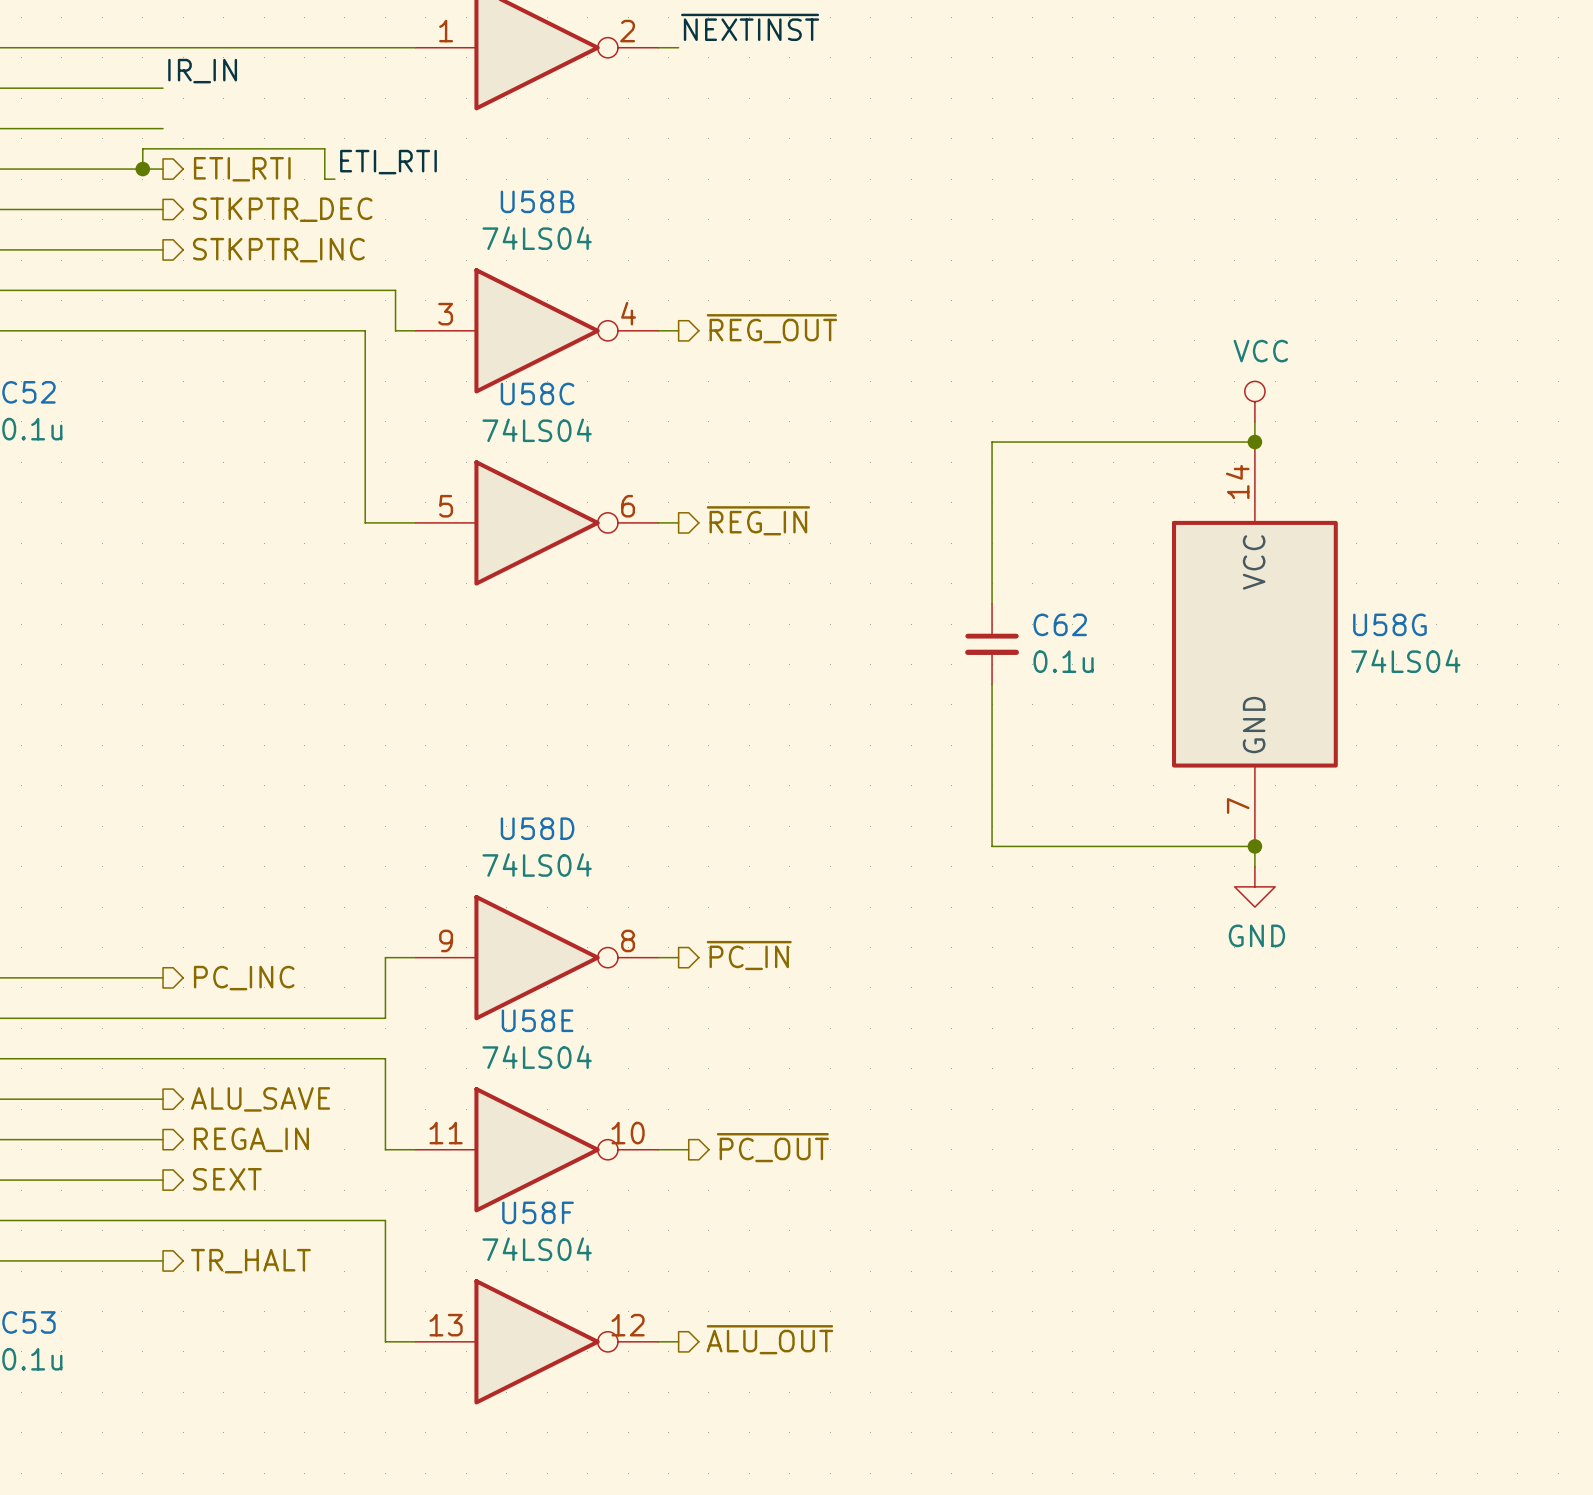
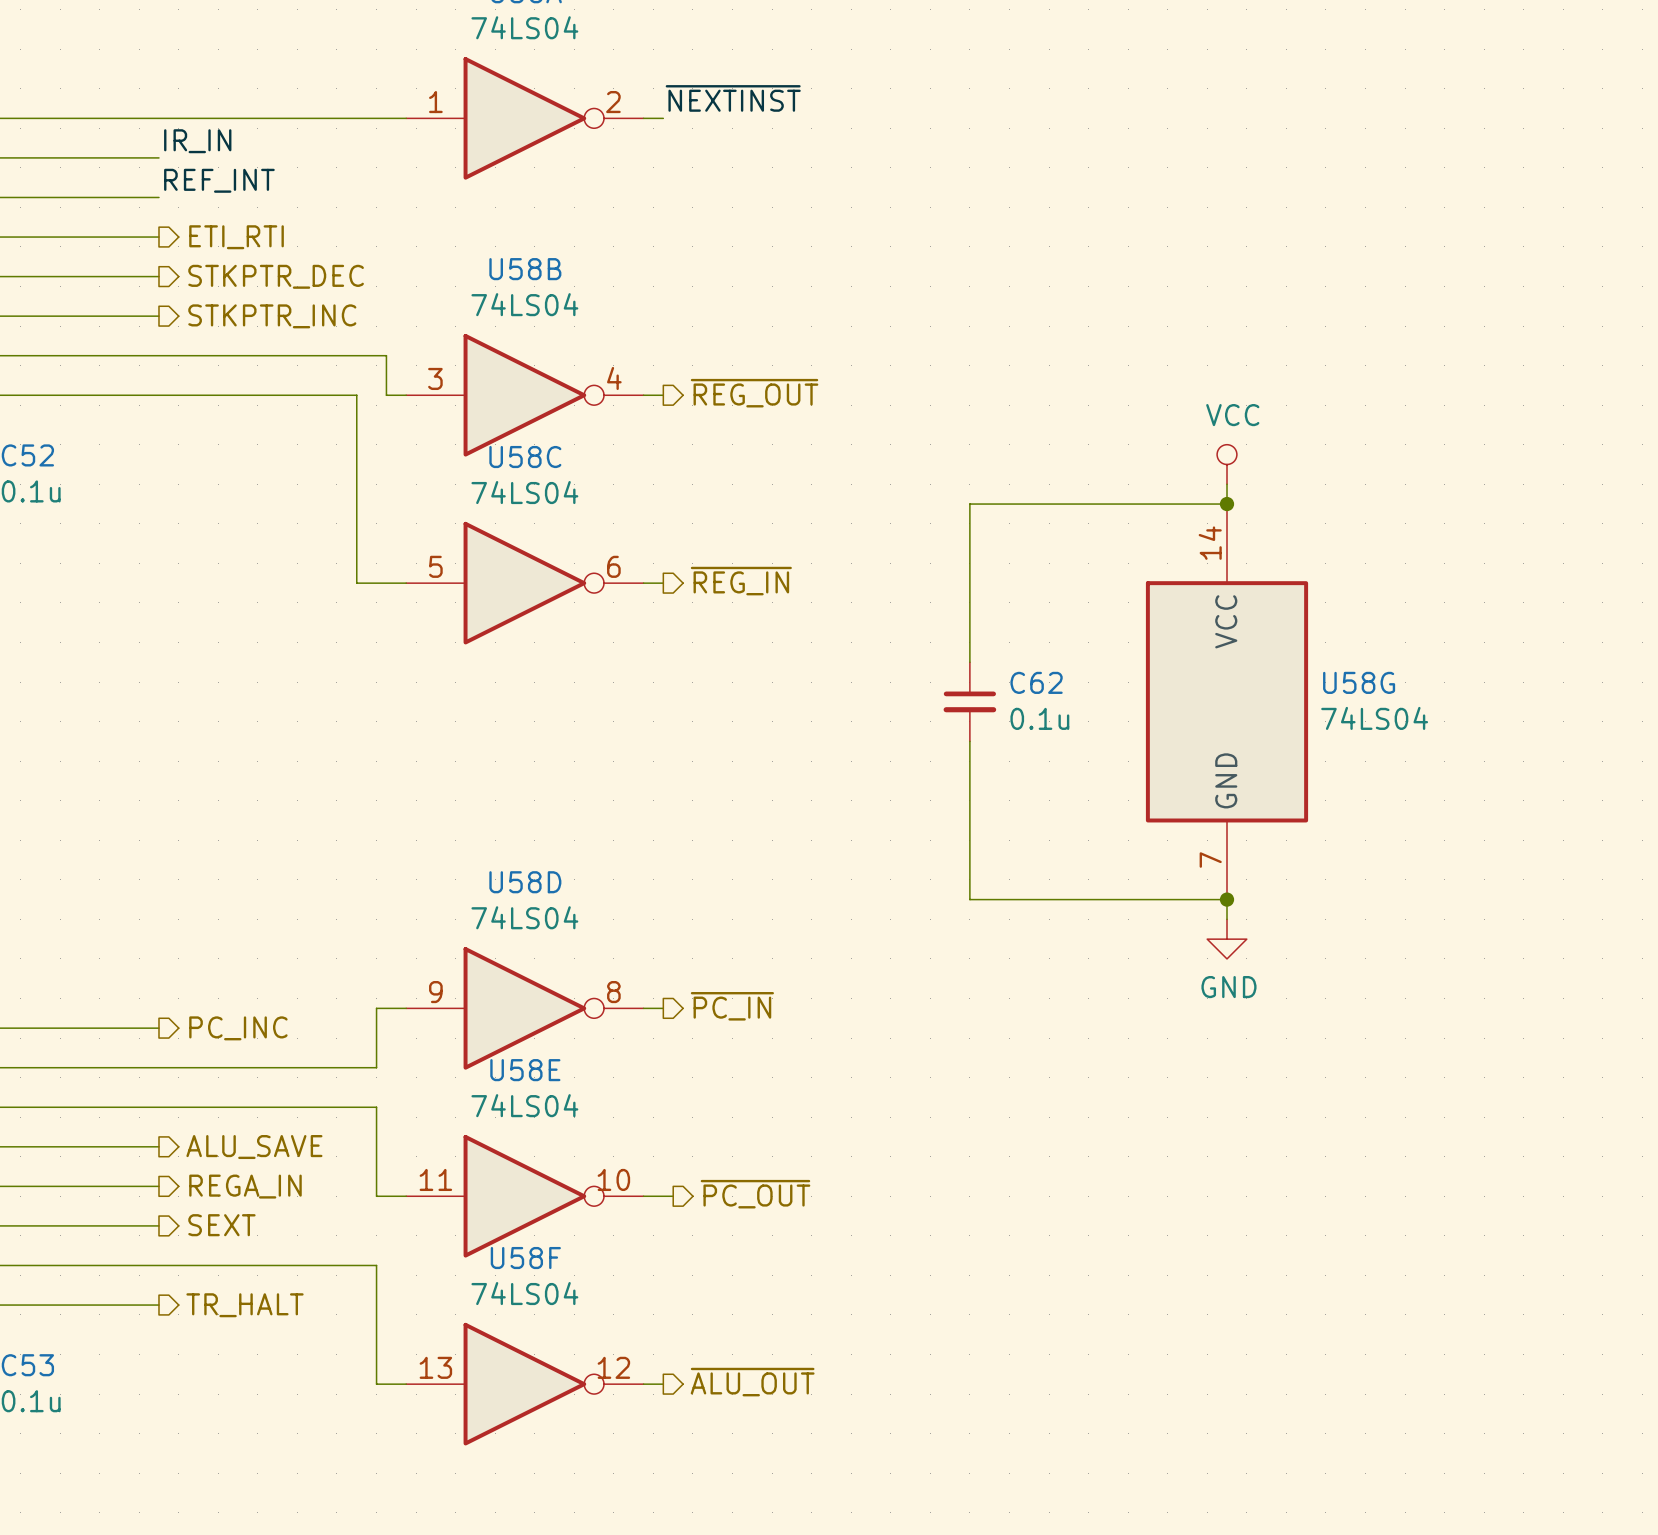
label: none -> REF_INT (219, 180)
label: ETI_RTI (388, 162) -> none
wire: (142, 169) (142, 148) (324, 148) (324, 179) (334, 179) -> none
junction: (142, 169) -> none

